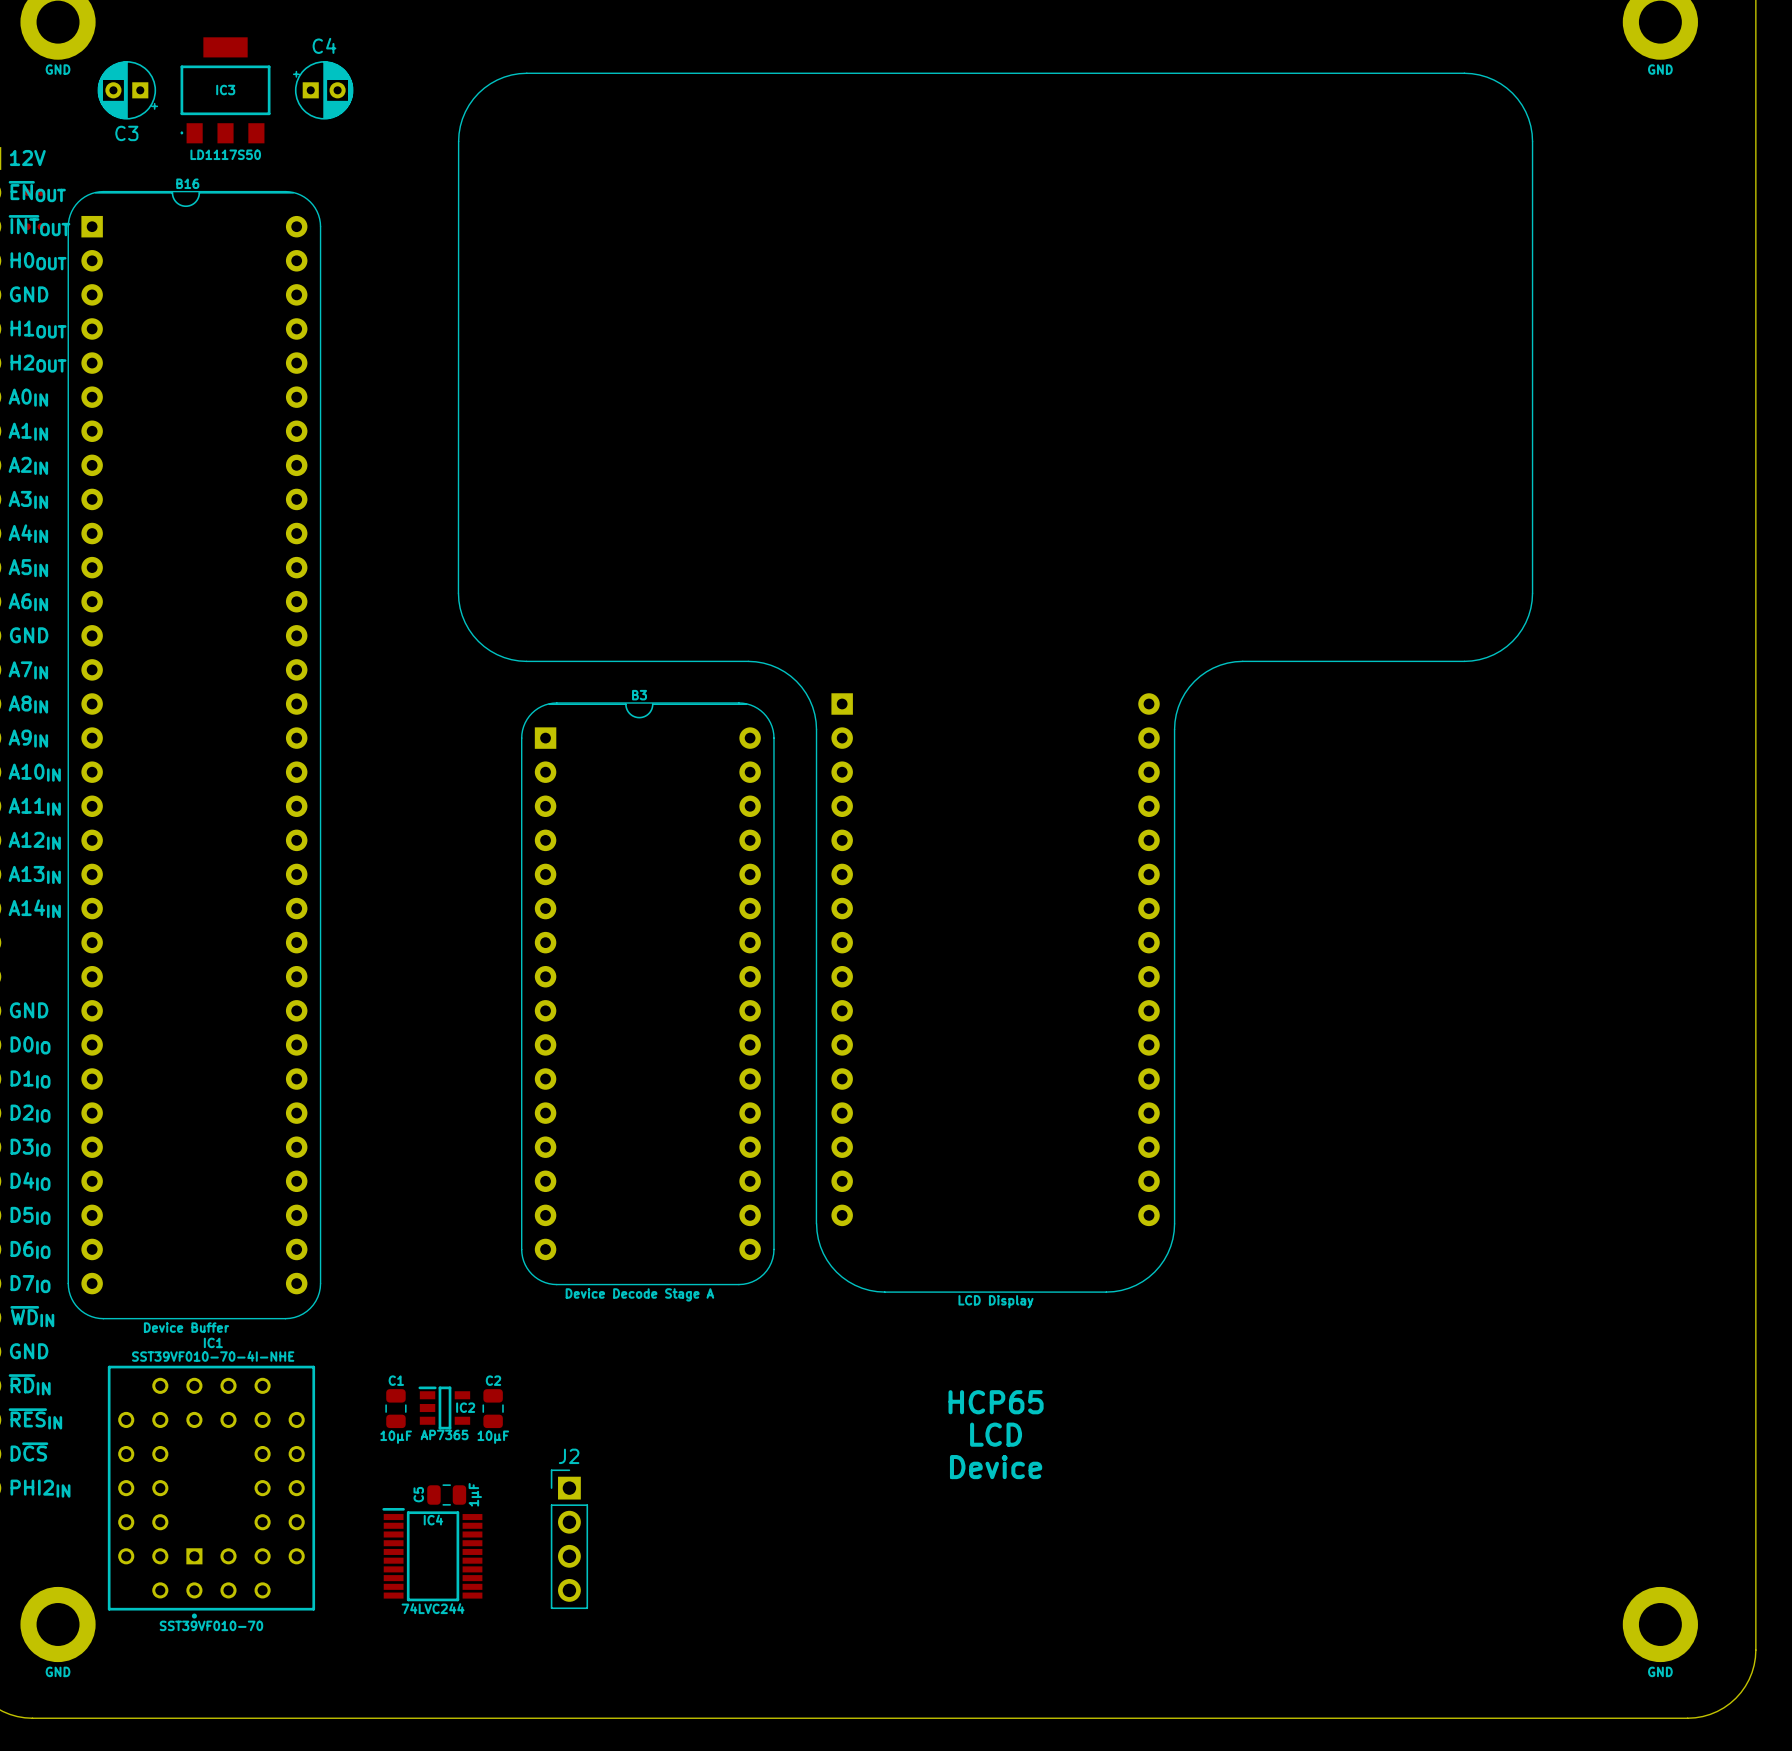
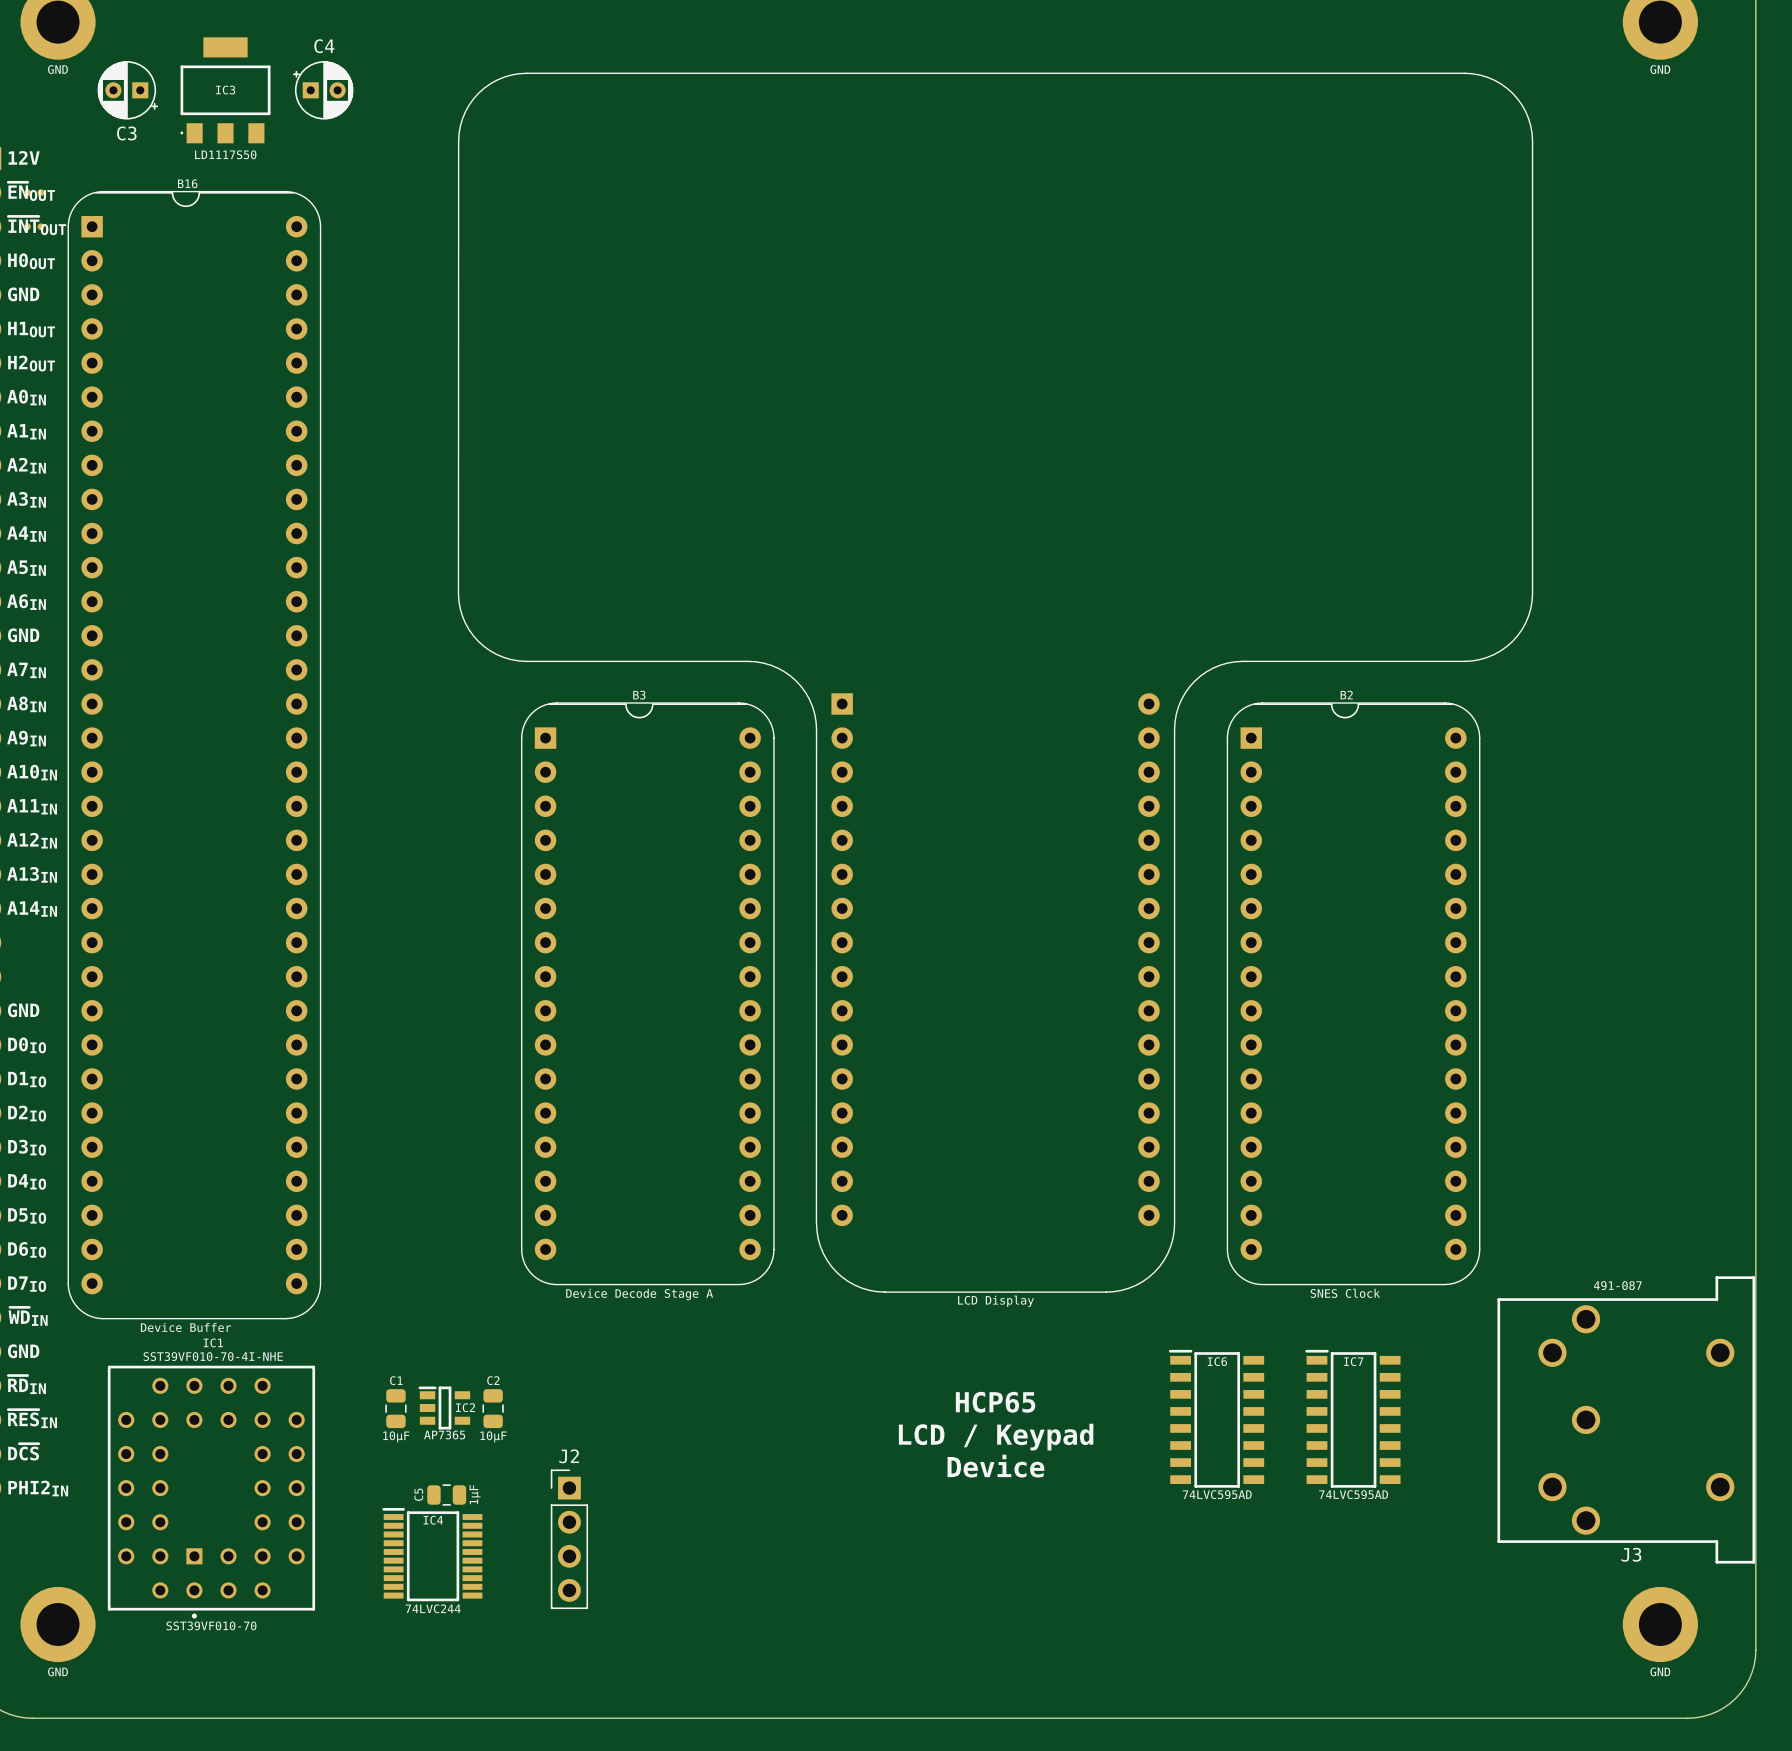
B2: none -> (1353, 993)
IC6: none -> 74LVC595AD (1216, 1418)
IC7: none -> 74LVC595AD (1352, 1418)
J3: none -> 491-087 (1626, 1419)
text: LCD (996, 1434) -> LCD / Keypad (996, 1437)

